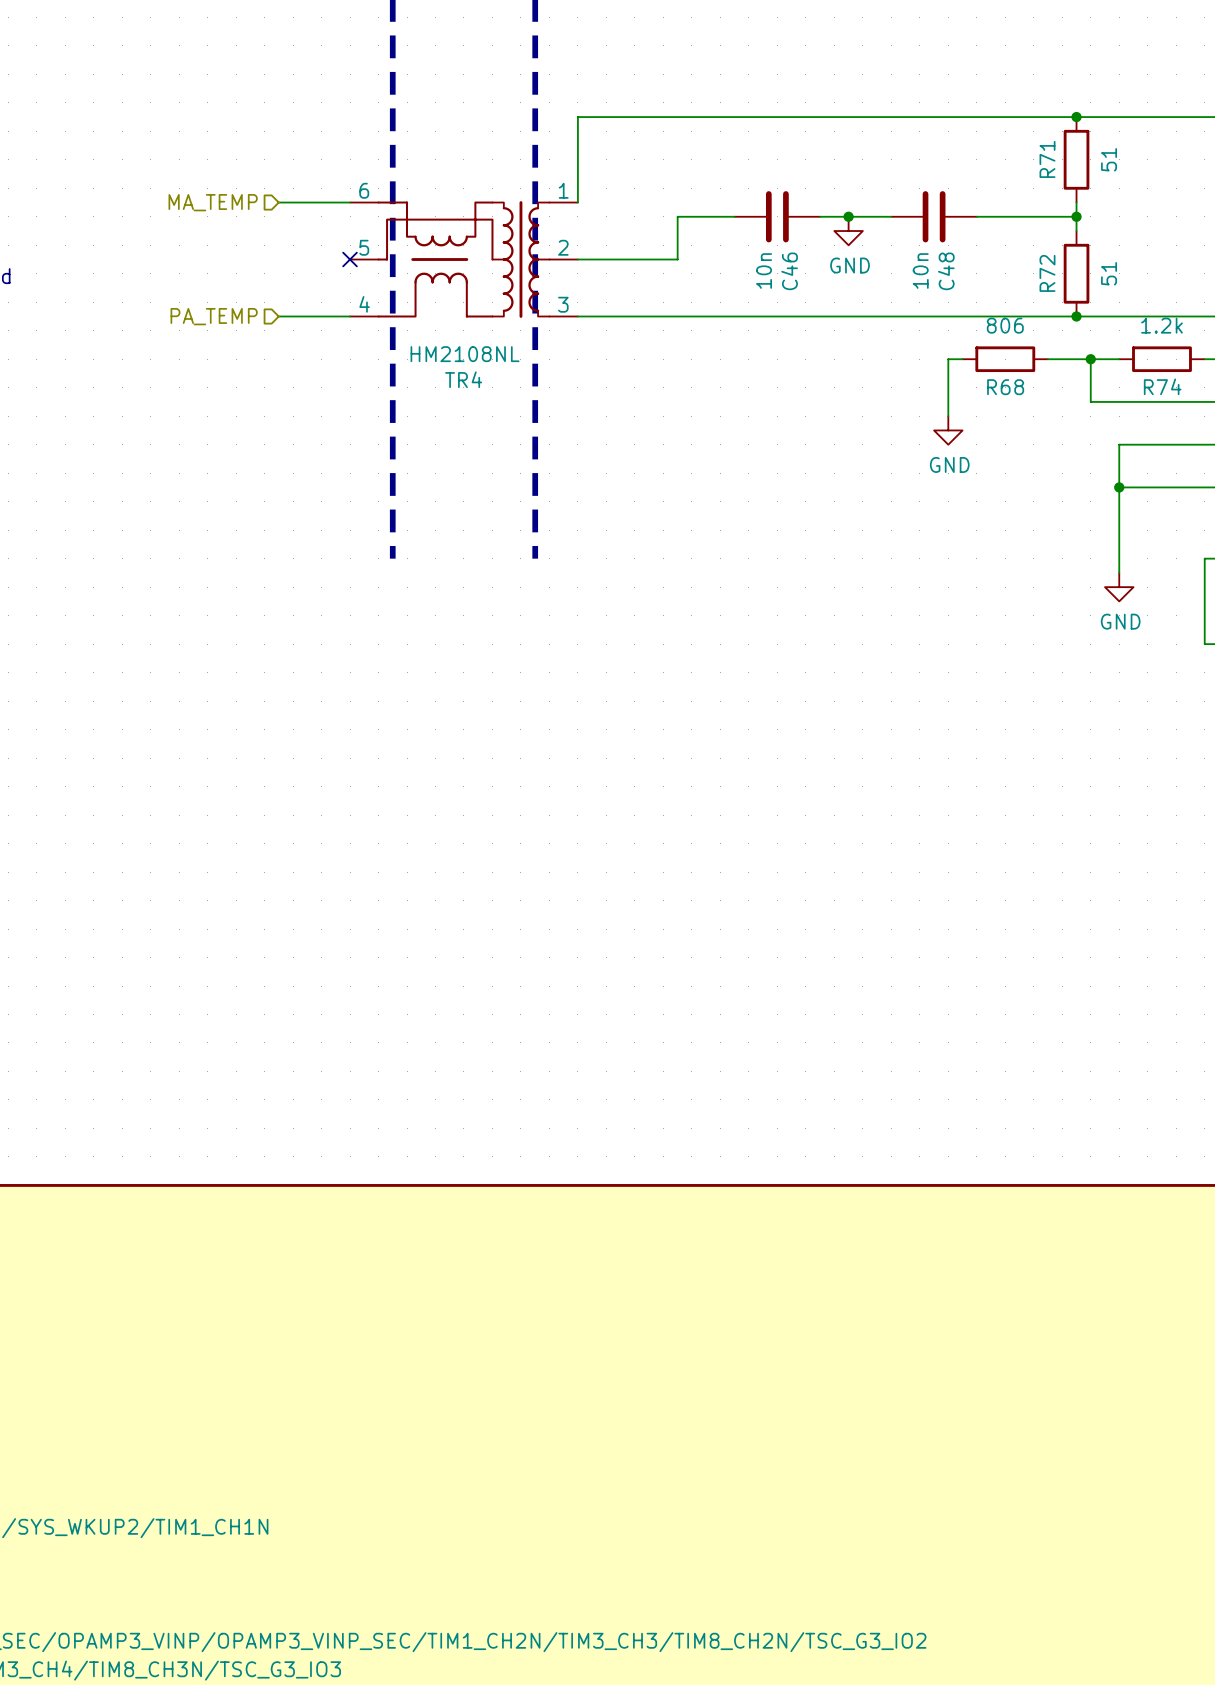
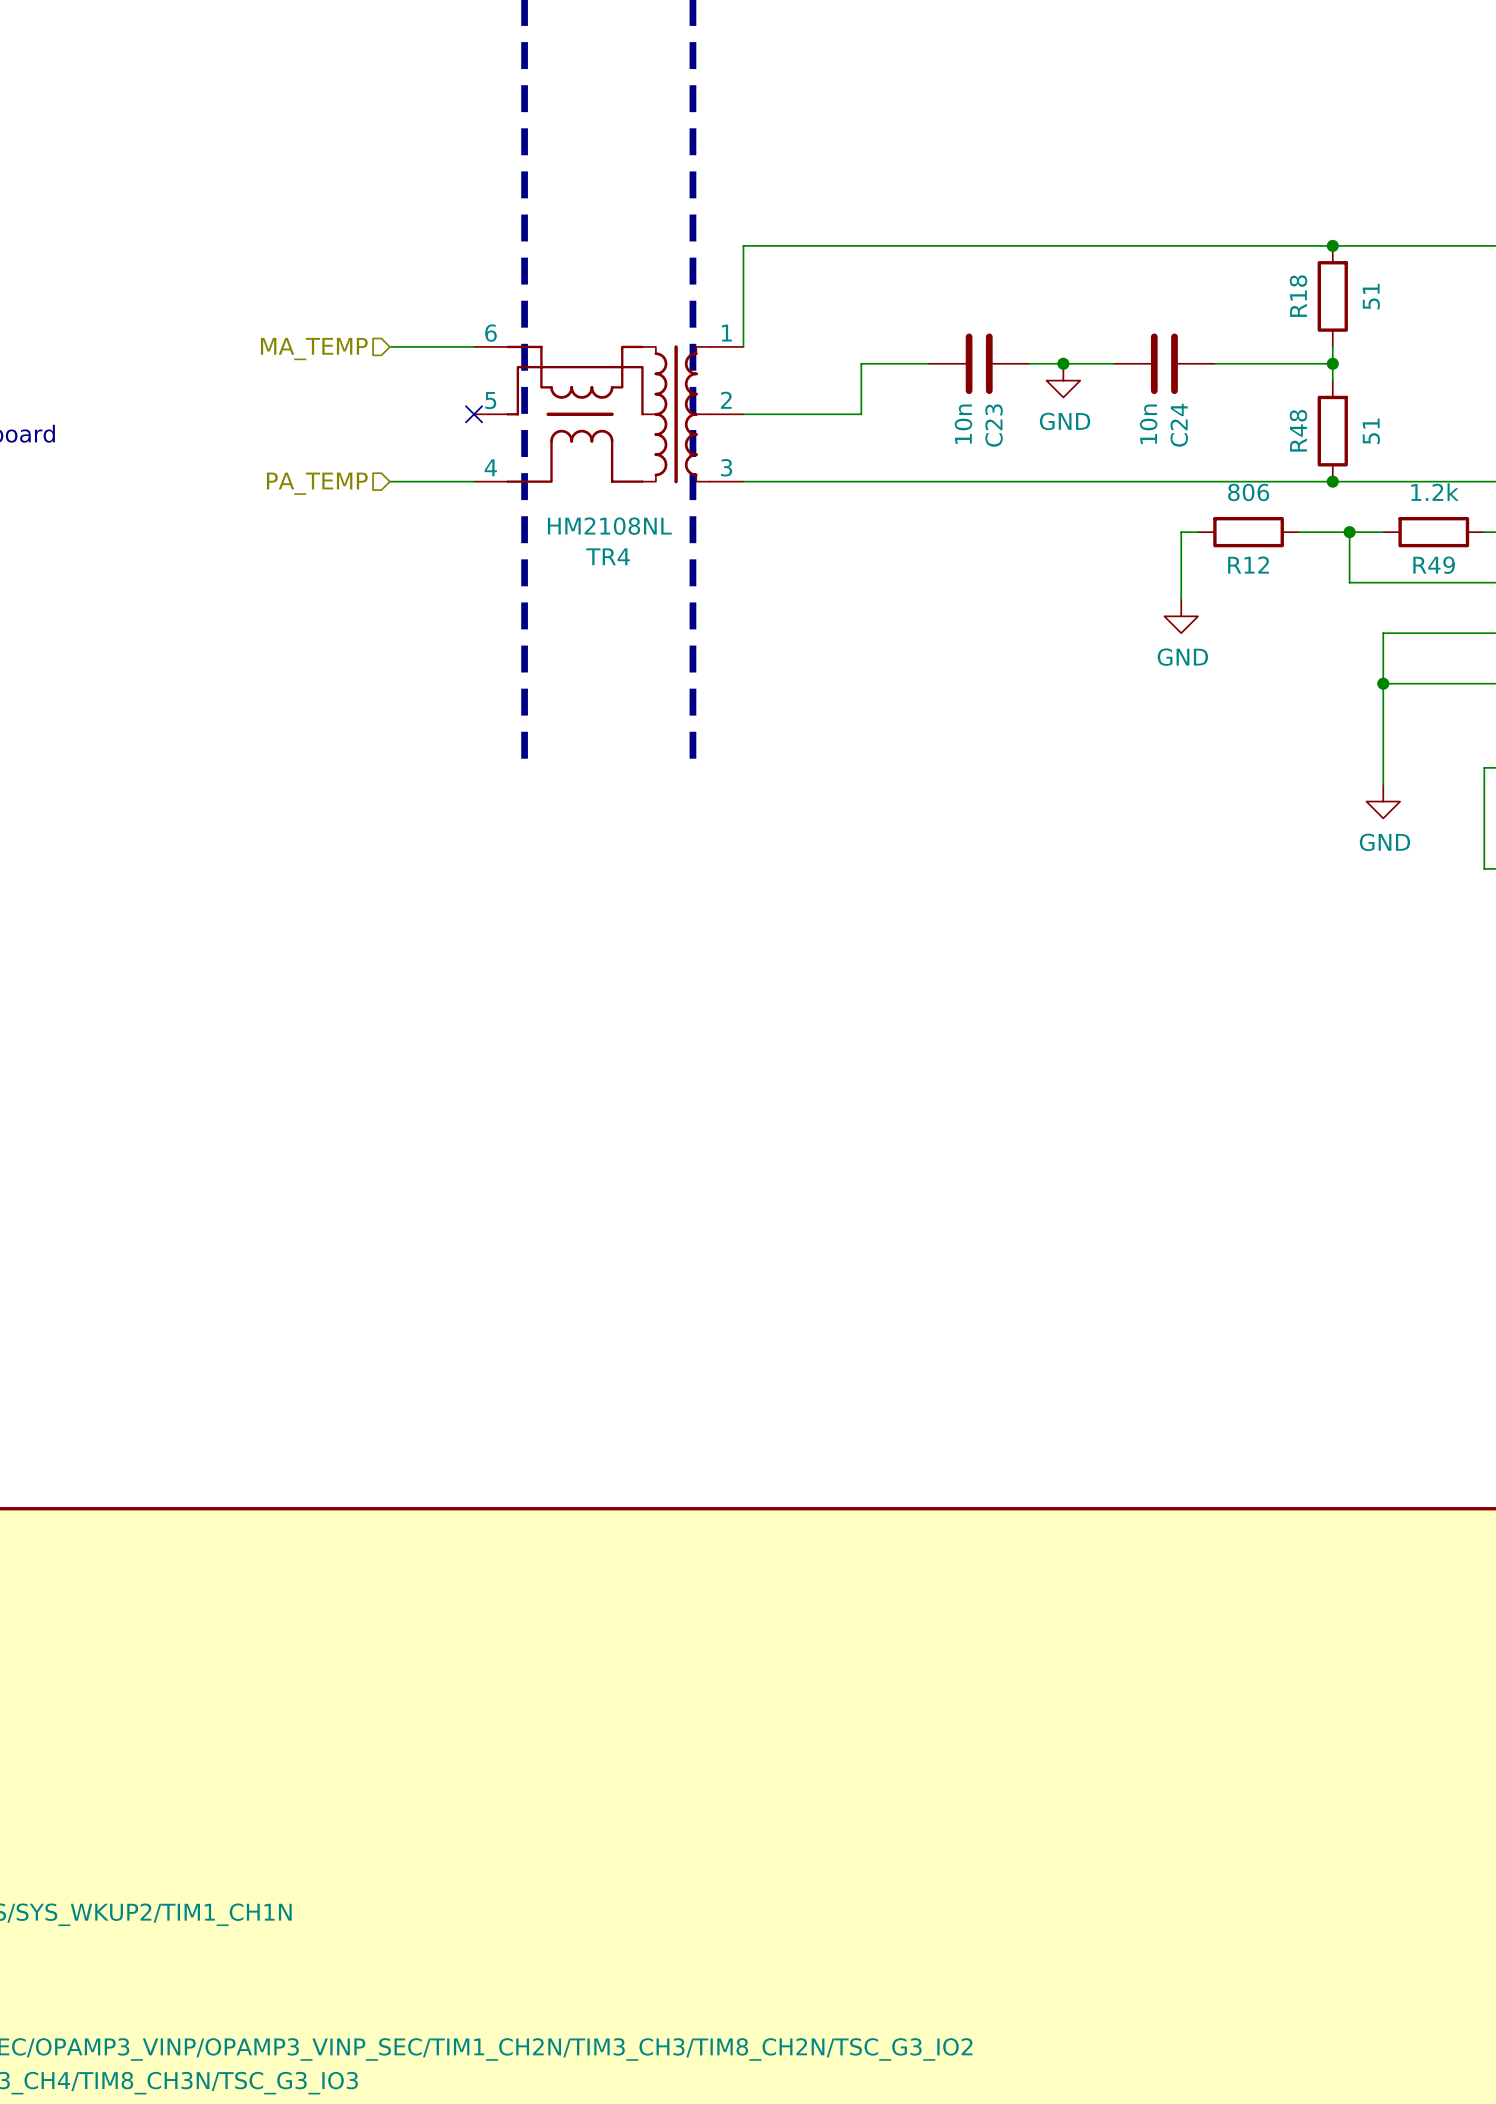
R71 name: R71 (1047, 159) -> R18 (1298, 296)
C46 name: C46 (789, 271) -> C23 (994, 425)
C48 name: C48 (946, 271) -> C24 (1179, 425)
R72 name: R72 (1047, 273) -> R48 (1298, 430)
R74 name: R74 (1162, 386) -> R49 (1434, 565)
R68 name: R68 (1005, 387) -> R12 (1248, 565)

